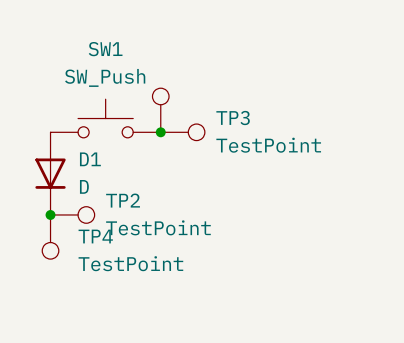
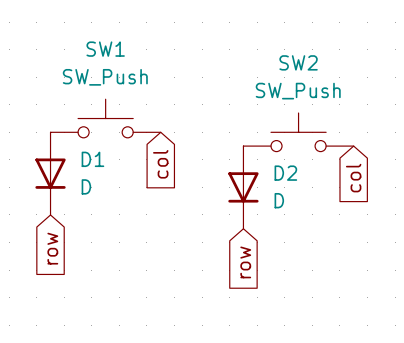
part: (160, 110) -> none
junction: (160, 132) -> none
TP3: TestPoint (182, 132) -> none
SW2: none -> SW_Push (298, 132)
global label: none -> col (160, 164)
global label: none -> col (353, 178)
D2: none -> D (243, 187)
junction: (50, 214) -> none
TP2: TestPoint (72, 214) -> none
TP4: TestPoint (50, 237) -> none
global label: none -> row (52, 248)
global label: none -> row (245, 262)

